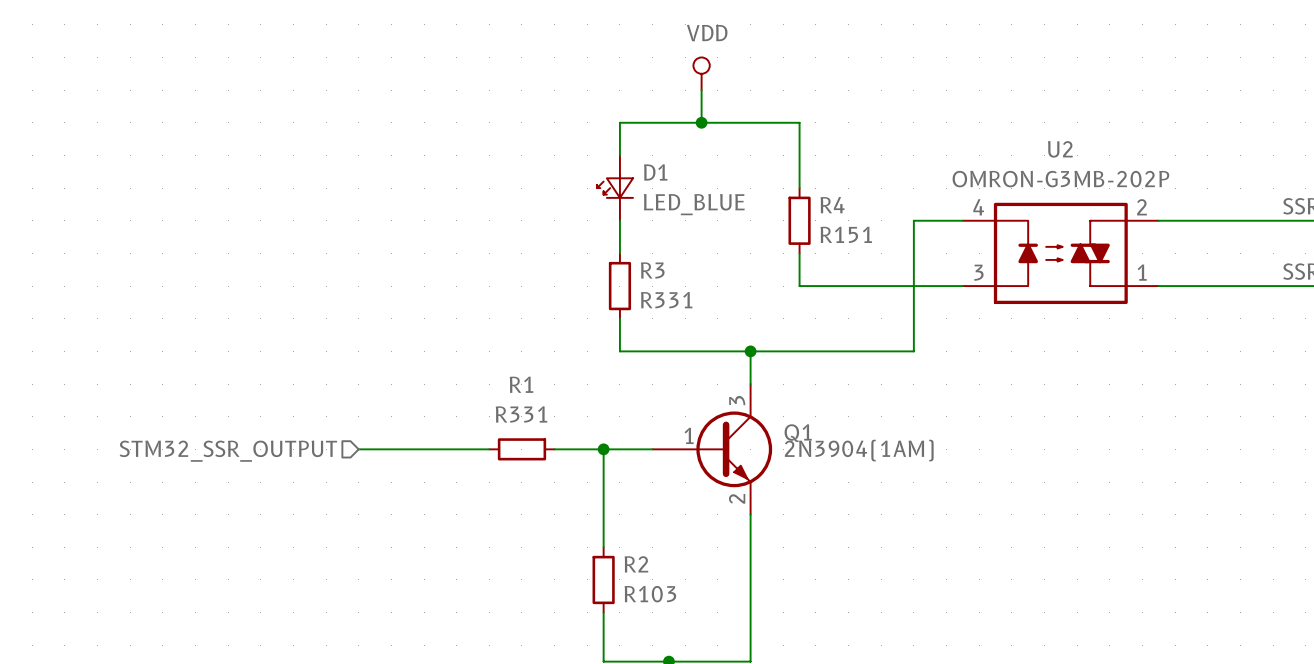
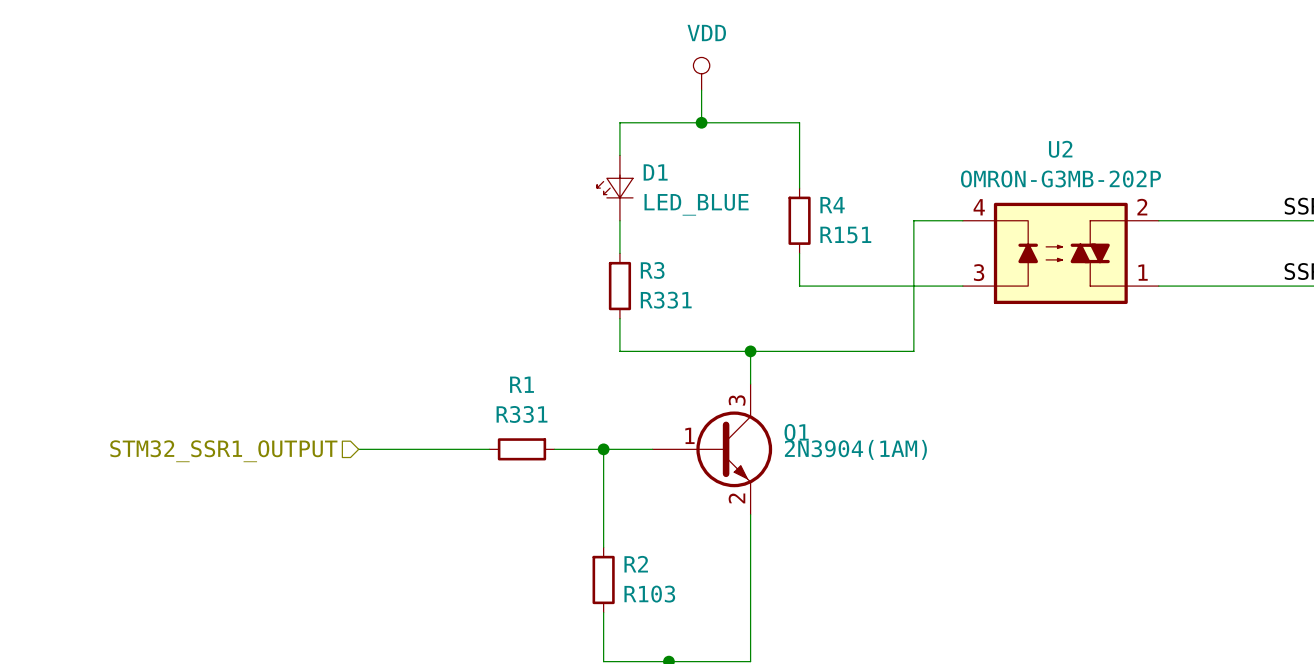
hierarchical label: STM32_SSR_OUTPUT (228, 451) -> STM32_SSR1_OUTPUT (223, 451)

